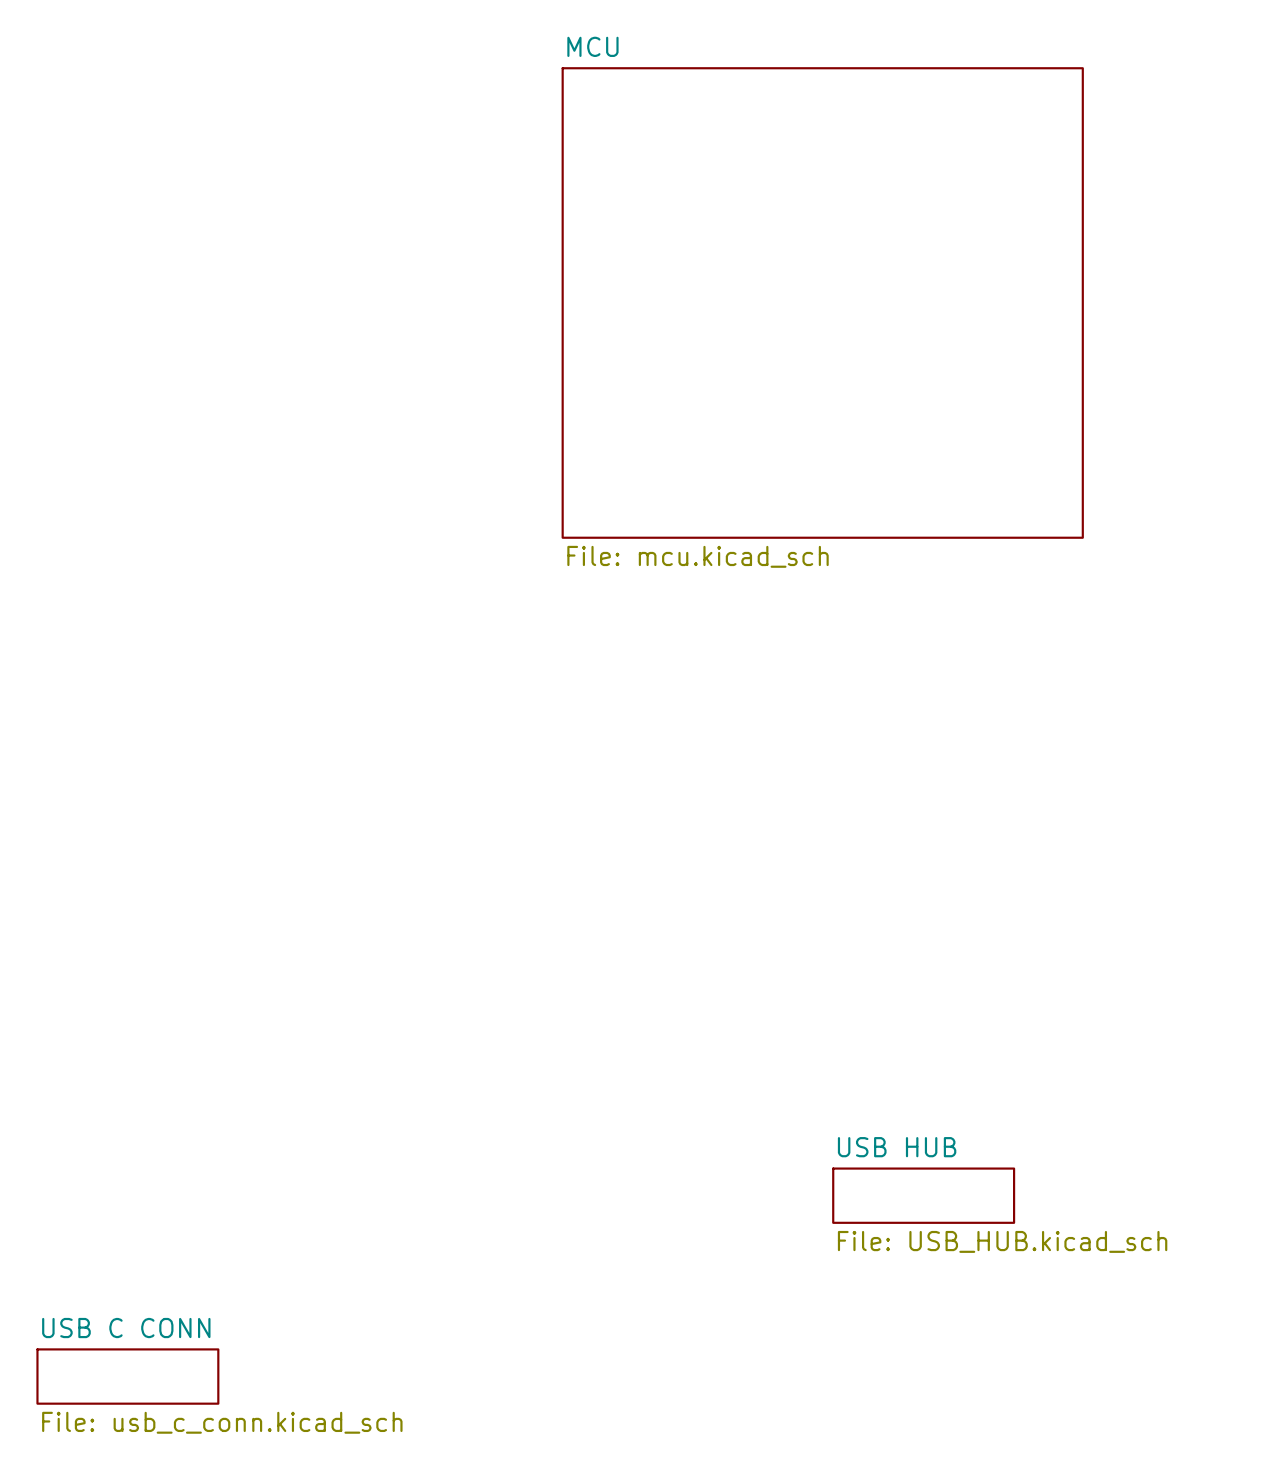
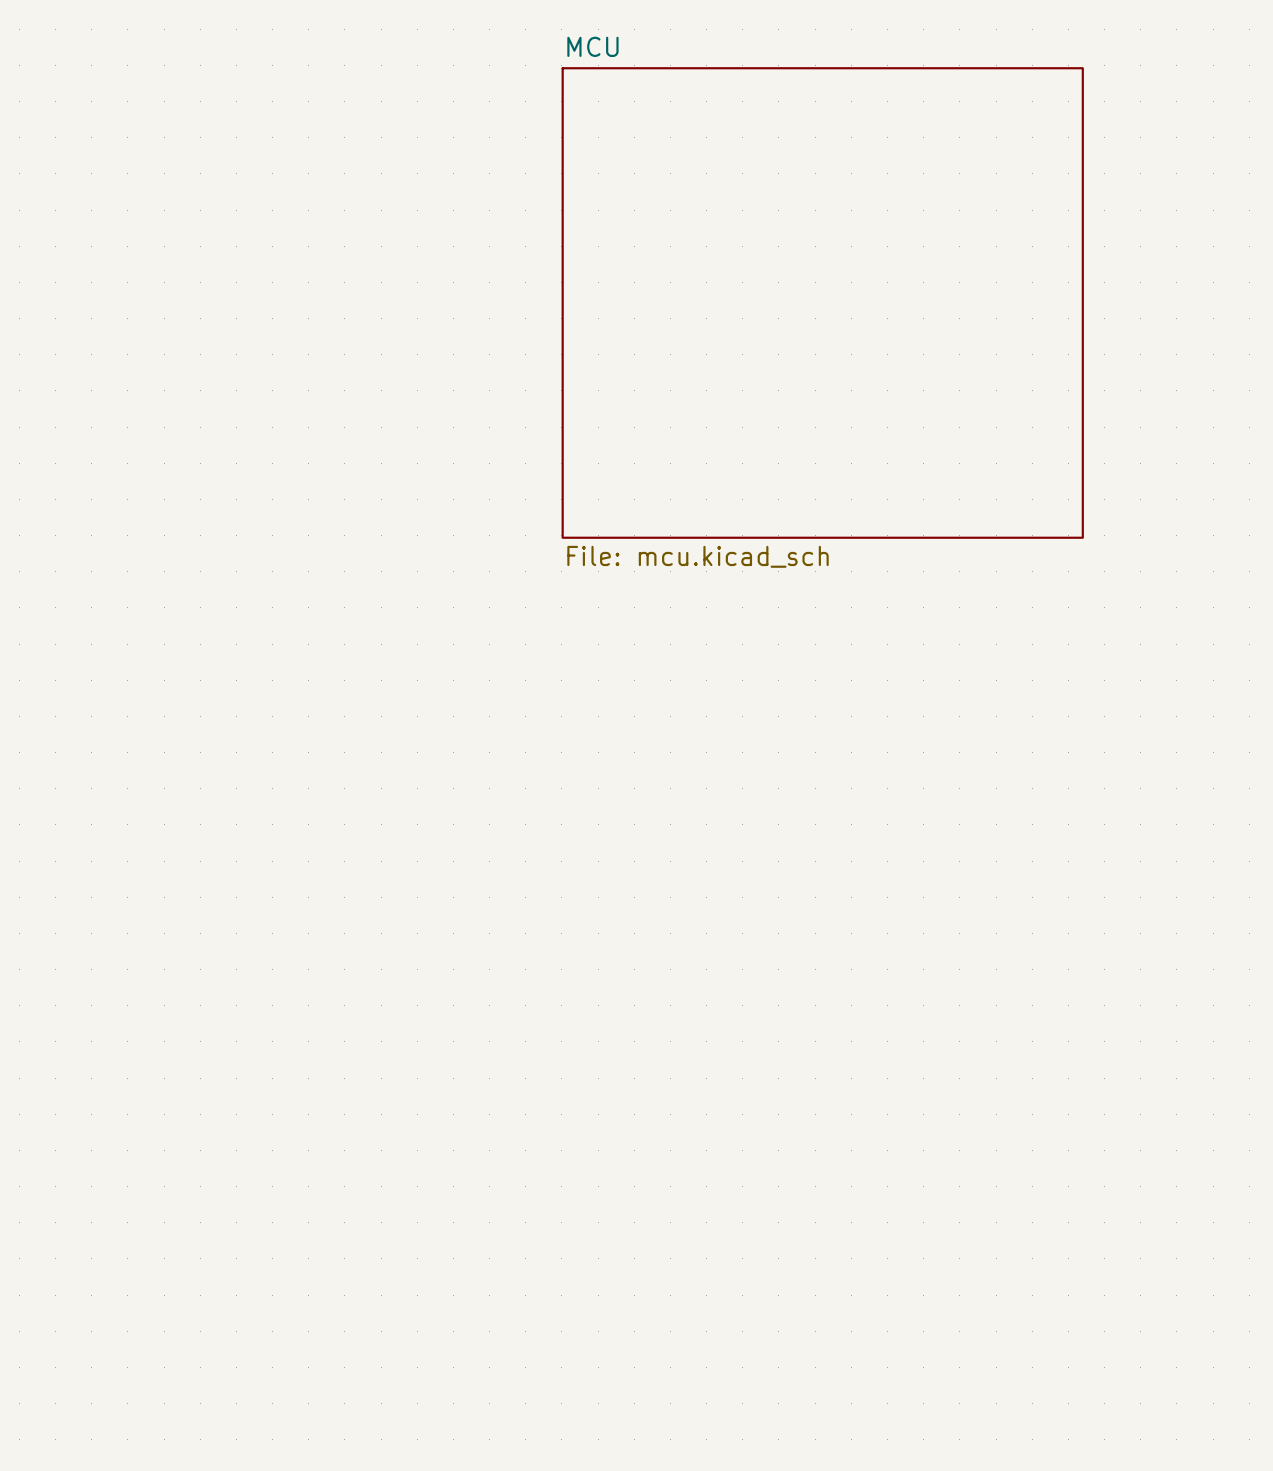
sheet USB HUB: File: USB_HUB.kicad_sch (923, 1195) -> none
sheet USB C CONN: File: usb_c_conn.kicad_sch (127, 1376) -> none

